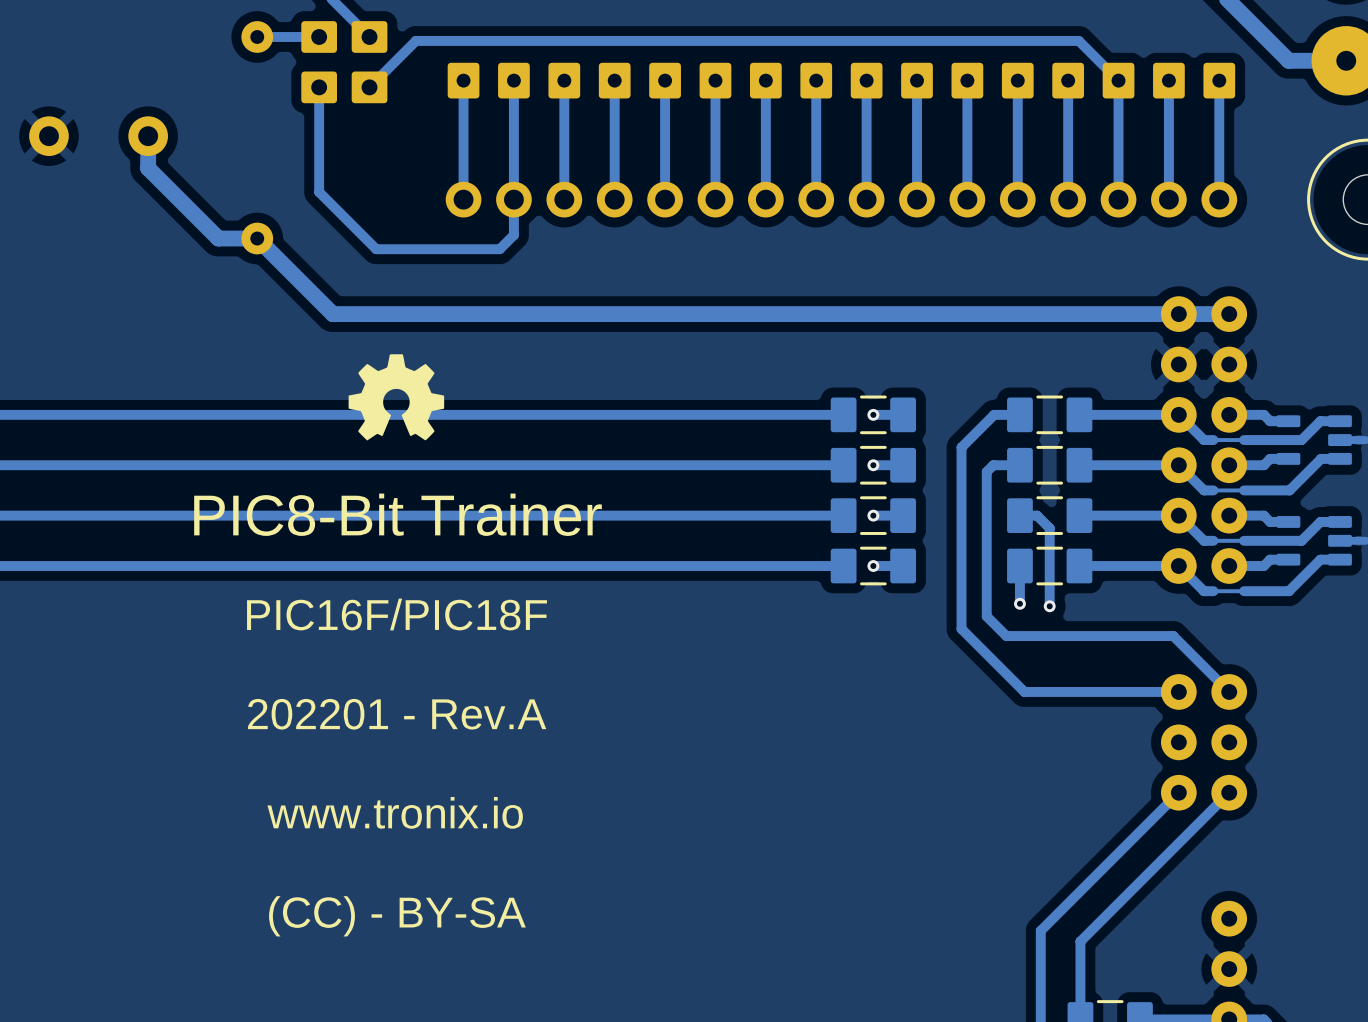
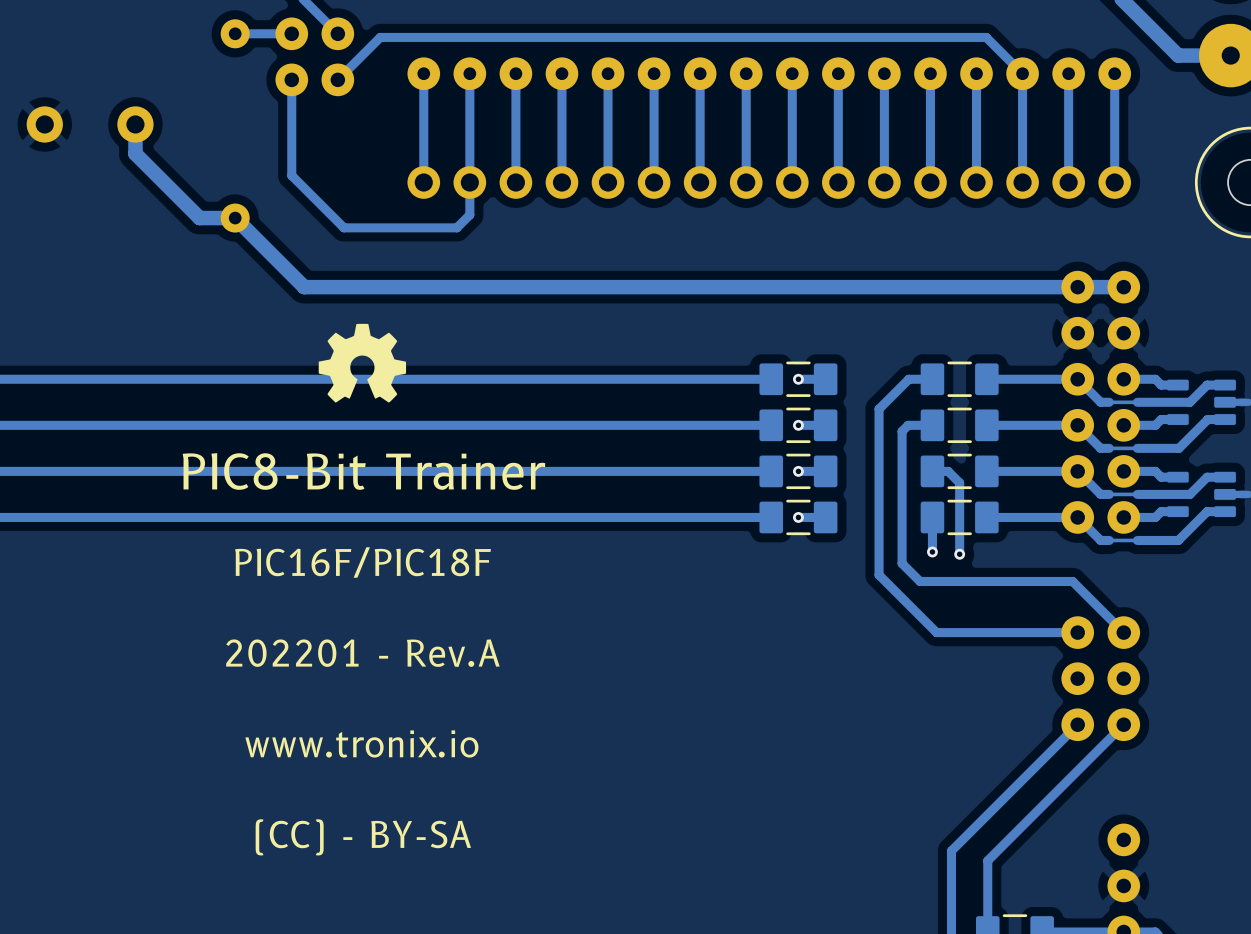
part footprint: [301, 21, 338, 104] -> [275, 17, 309, 97]
part footprint: [351, 21, 388, 104] -> [321, 17, 355, 97]
part footprint: [447, 62, 1236, 99] -> [407, 57, 1132, 91]

